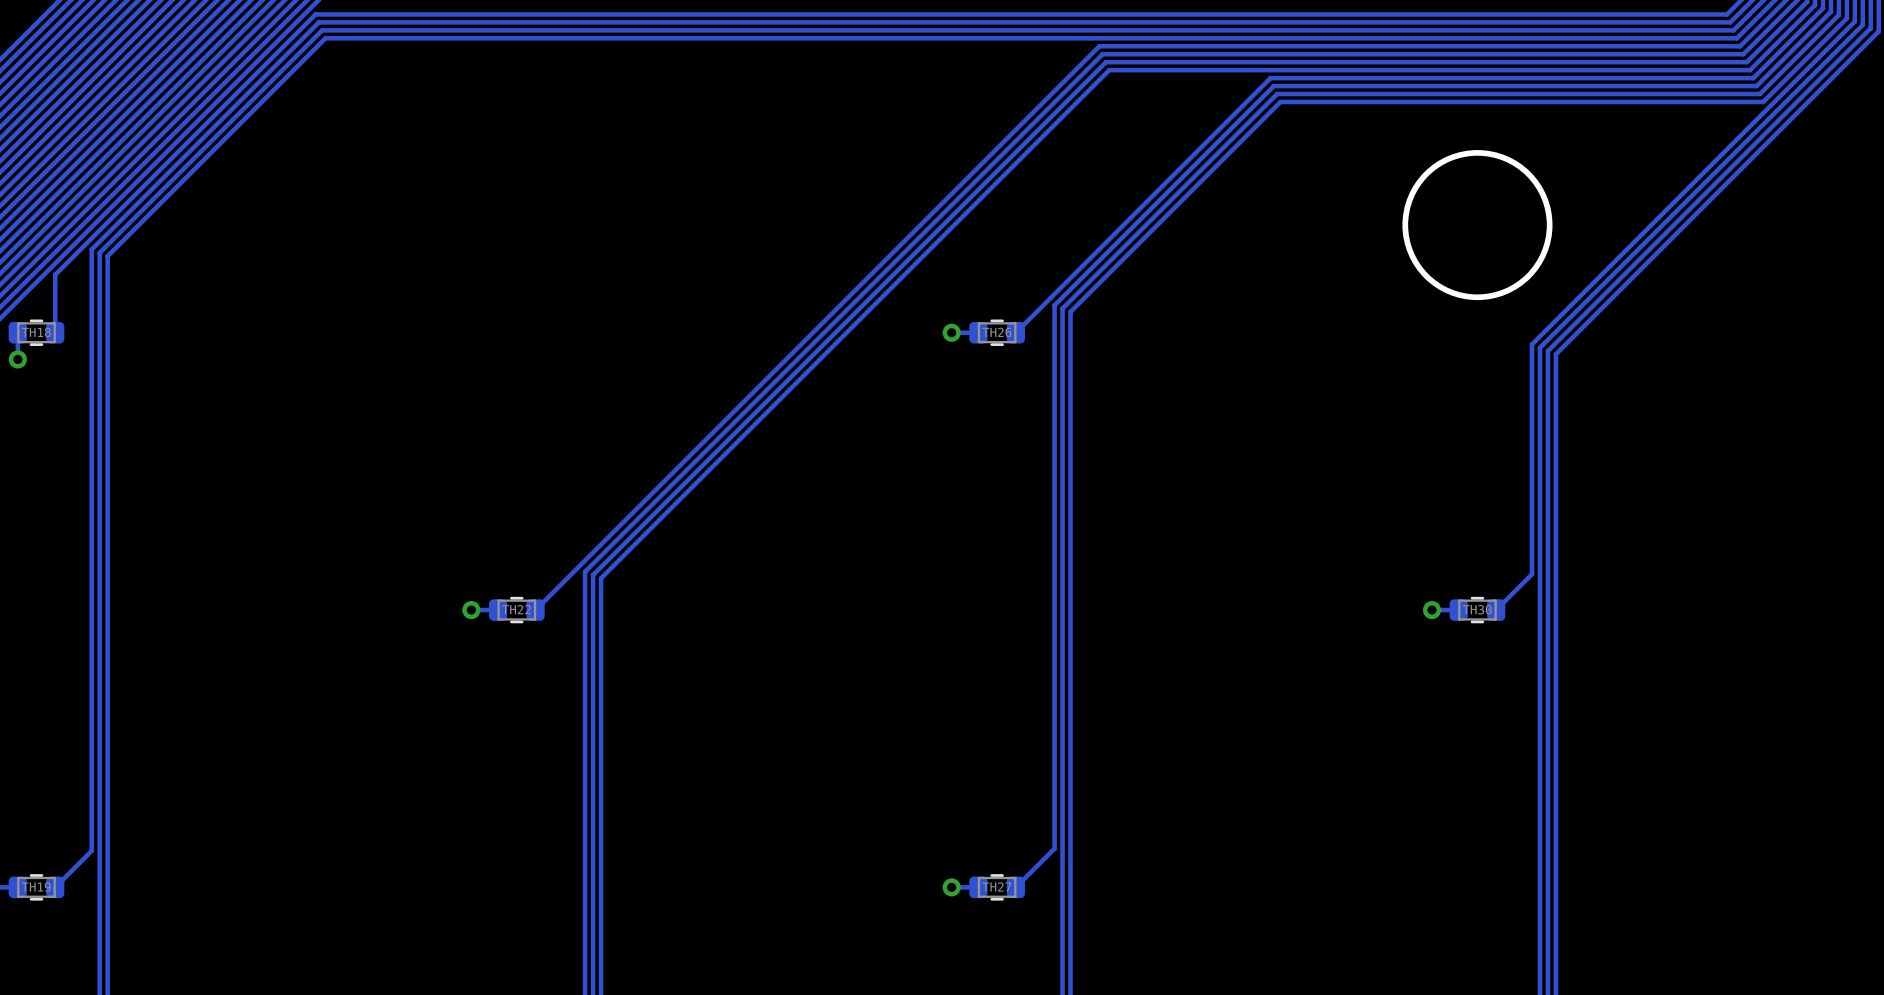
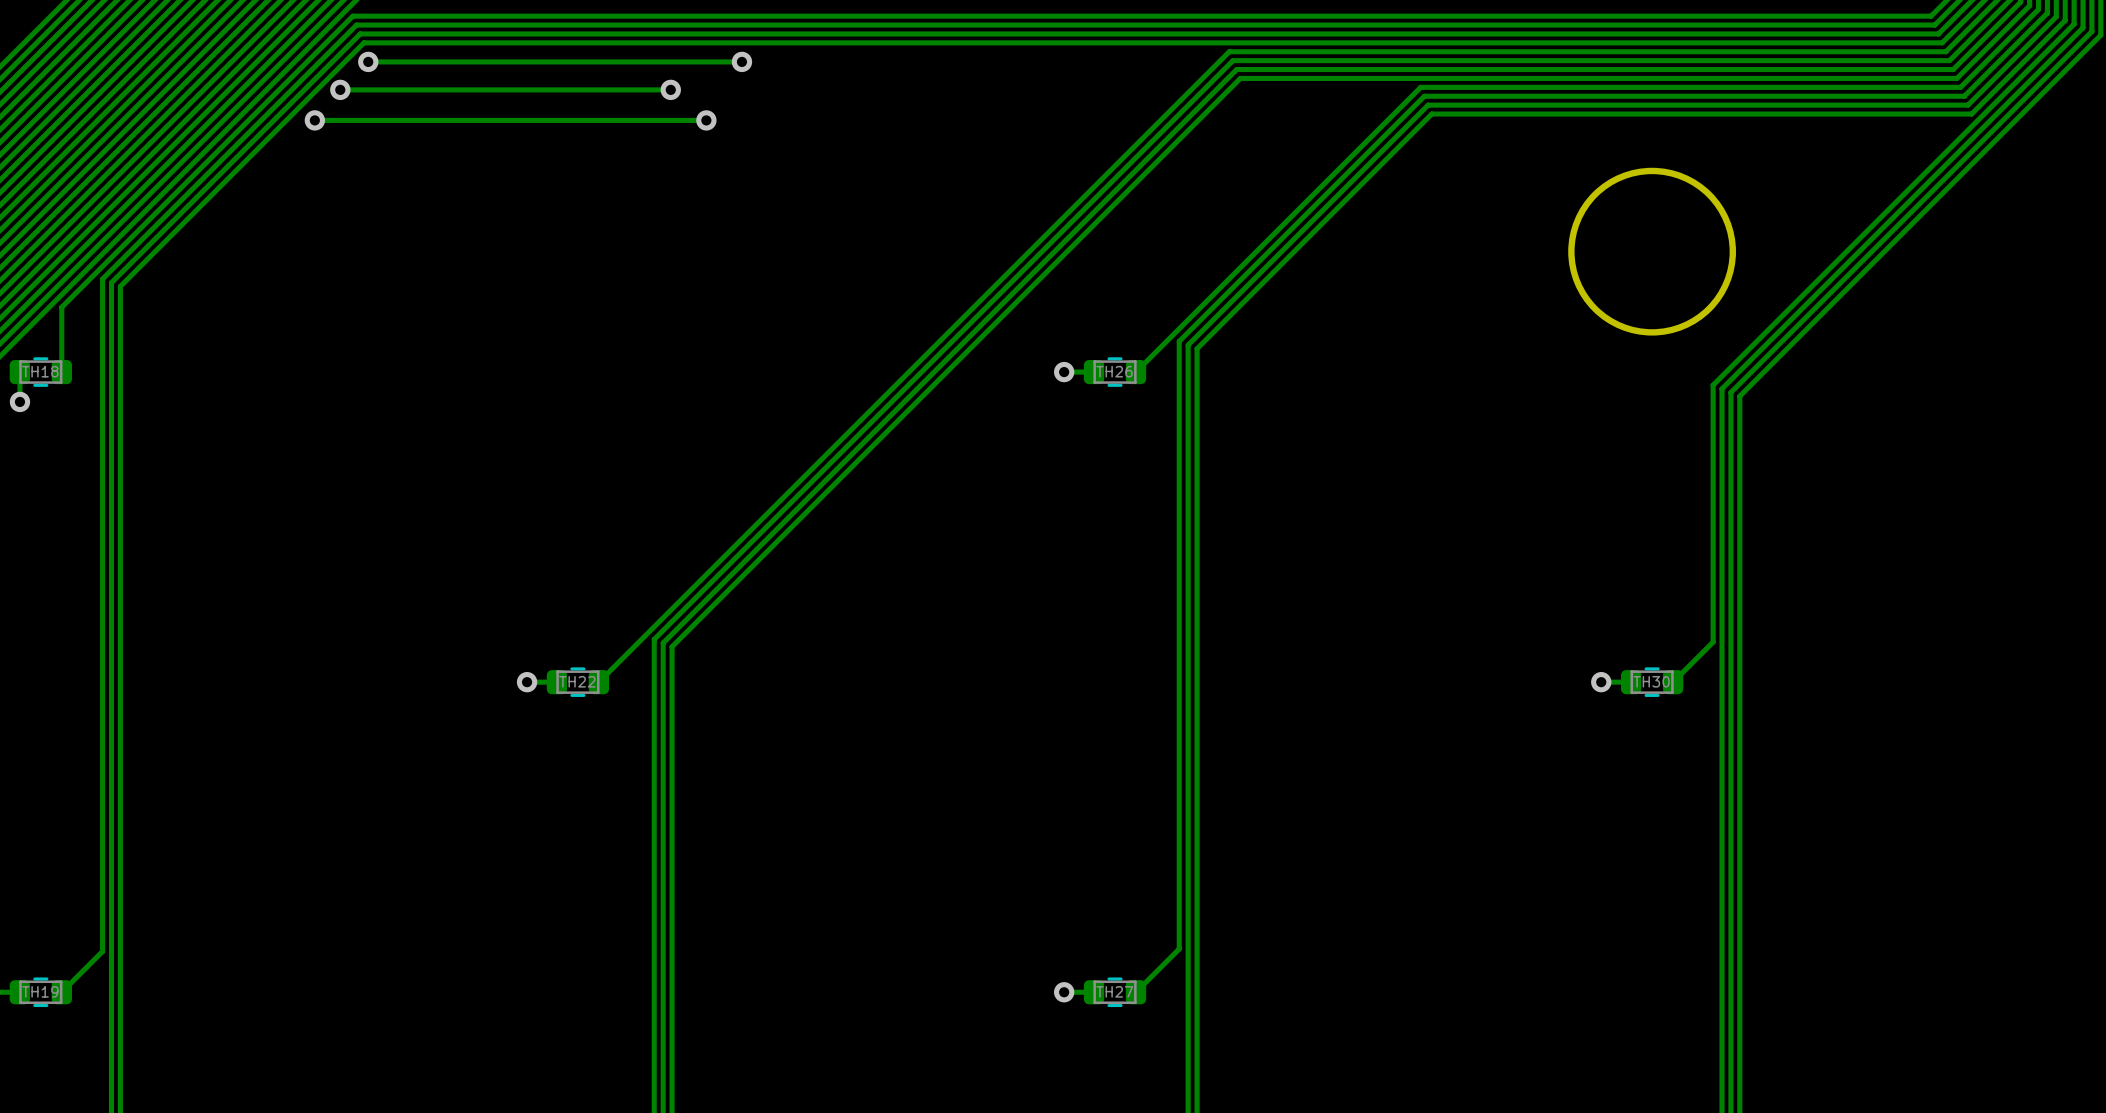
via: none -> (368, 61)
track: none -> (741, 61) (368, 61)
via: none -> (741, 61)
via: none -> (340, 89)
track: none -> (670, 89) (340, 89)
via: none -> (670, 89)
via: none -> (314, 120)
track: none -> (706, 120) (314, 120)
via: none -> (706, 120)

